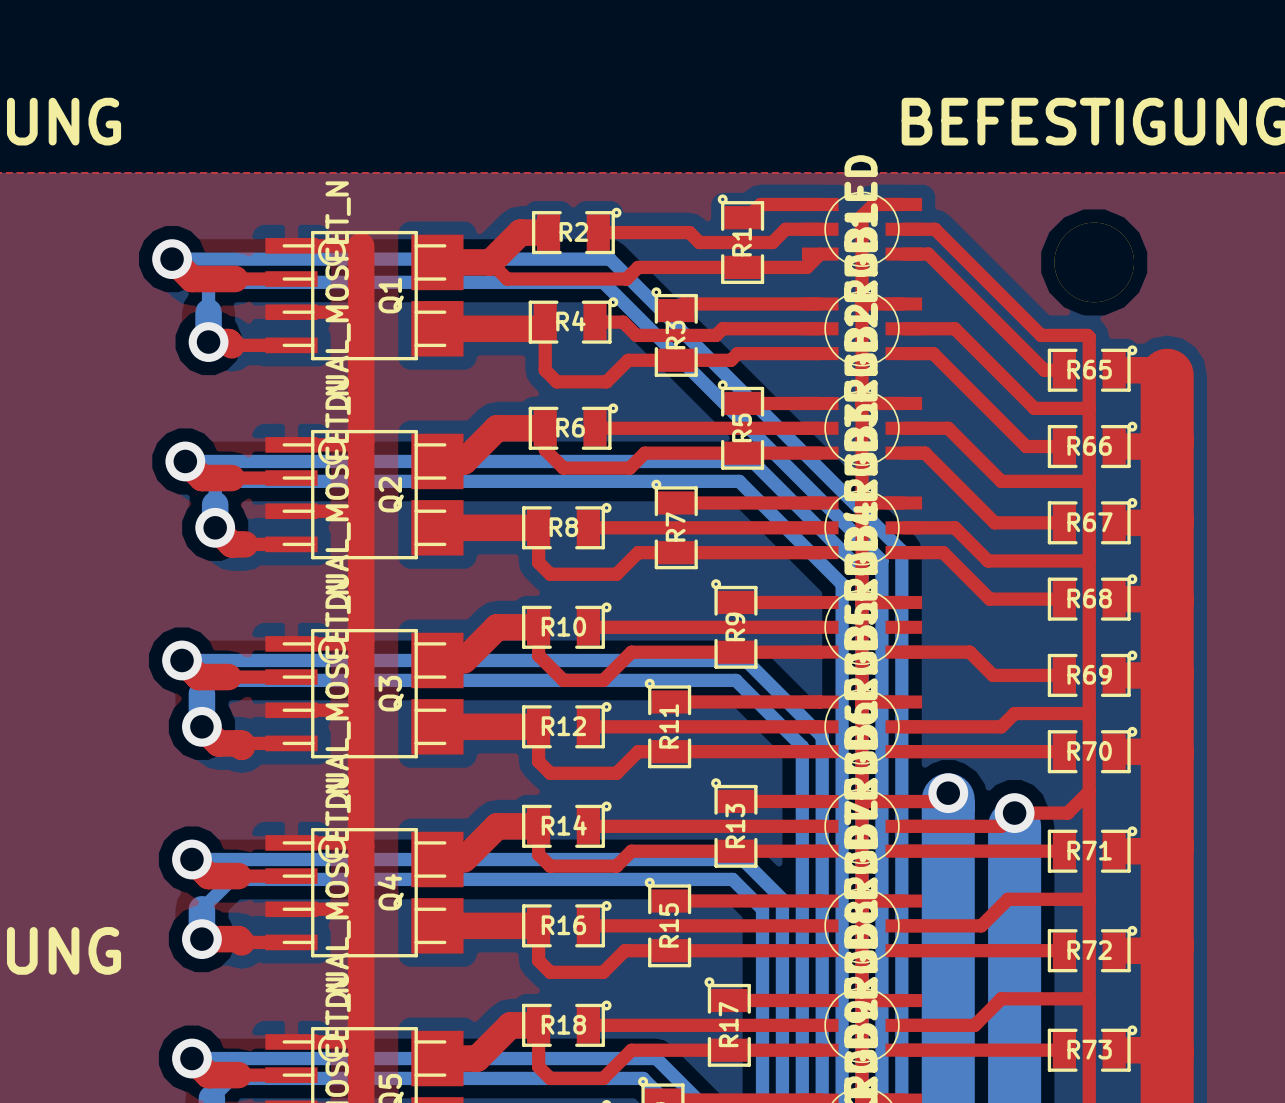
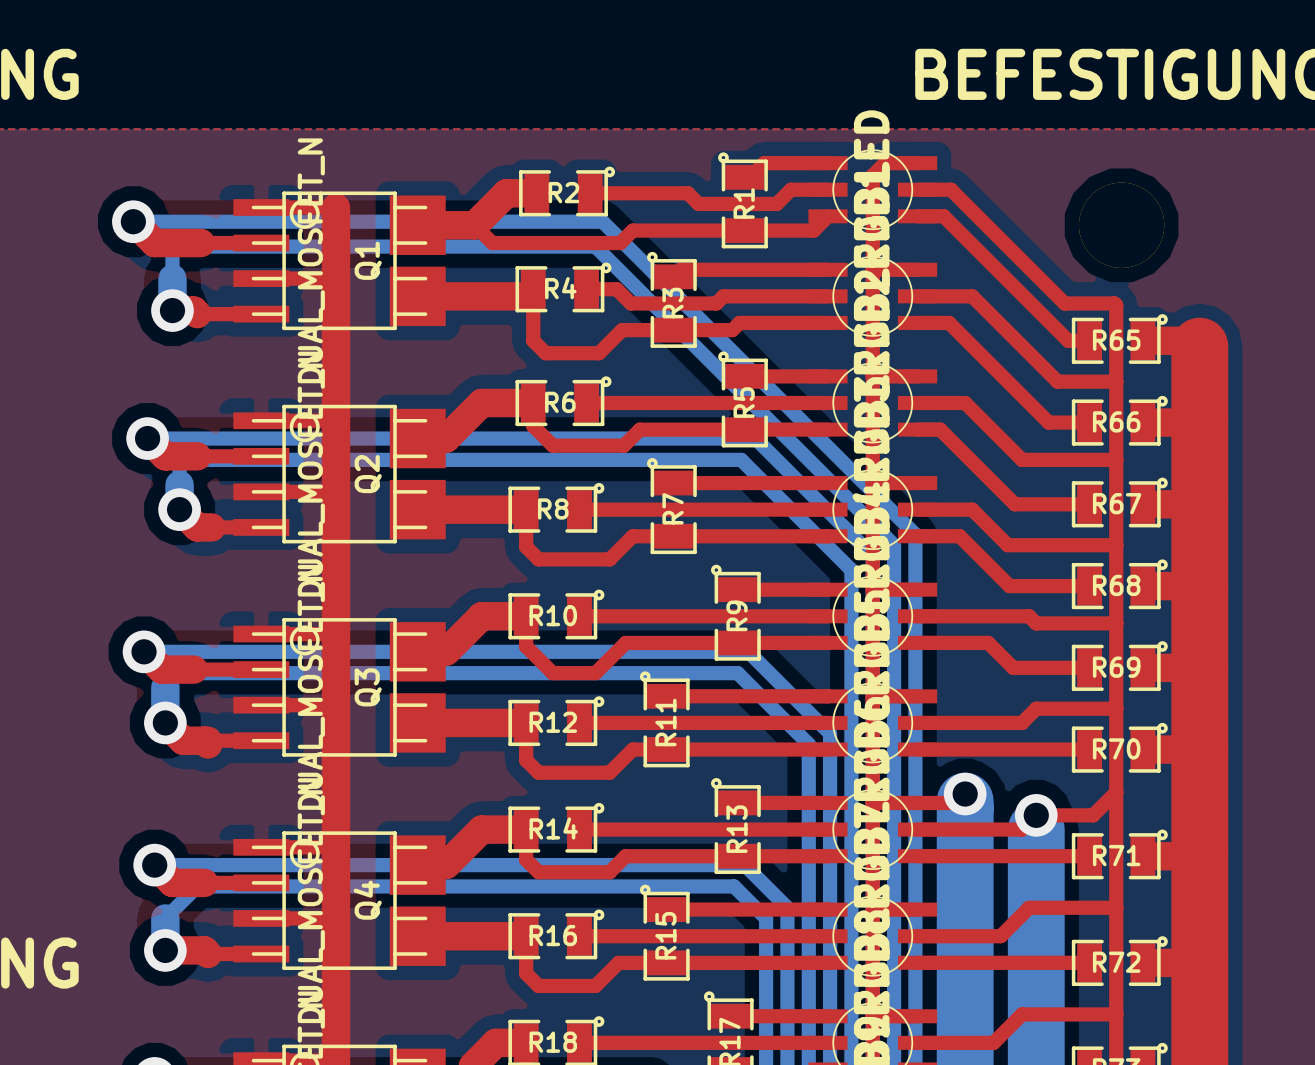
top track: none -> (917, 616) (1029, 616) (1036, 623) (1116, 623)

